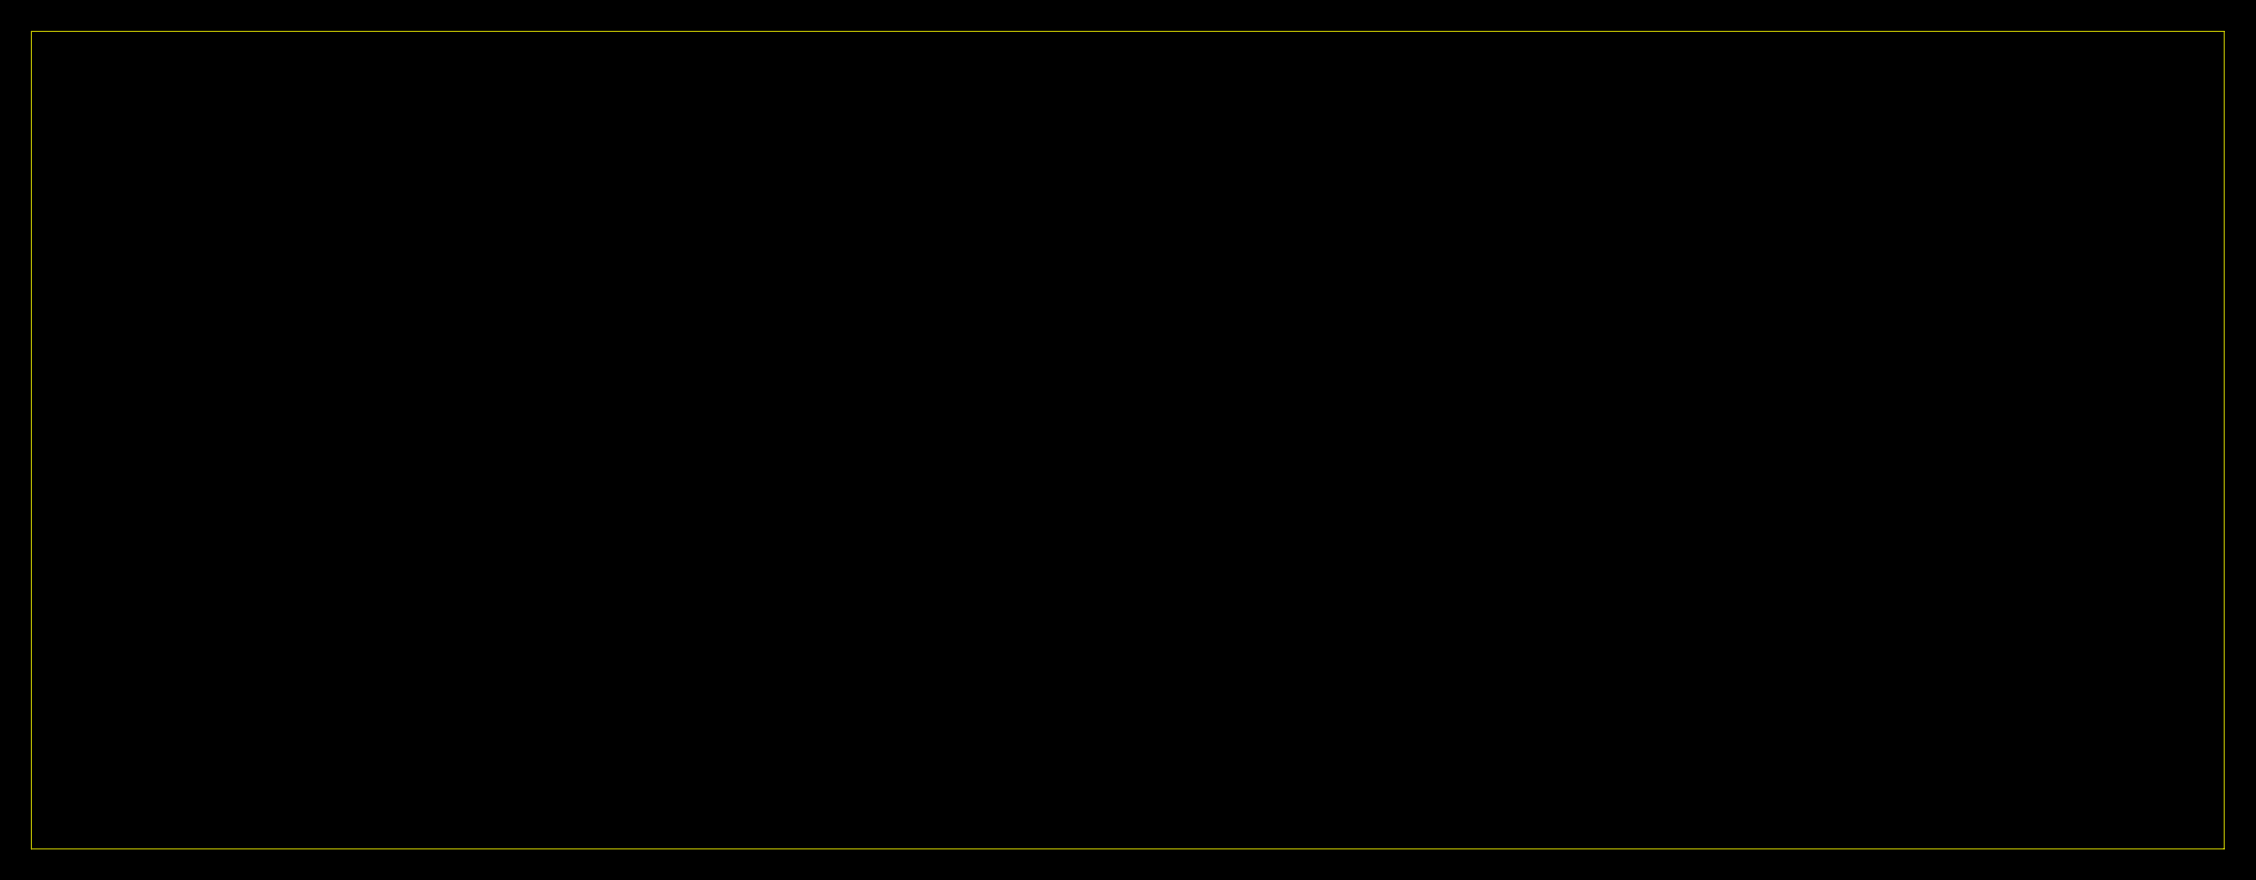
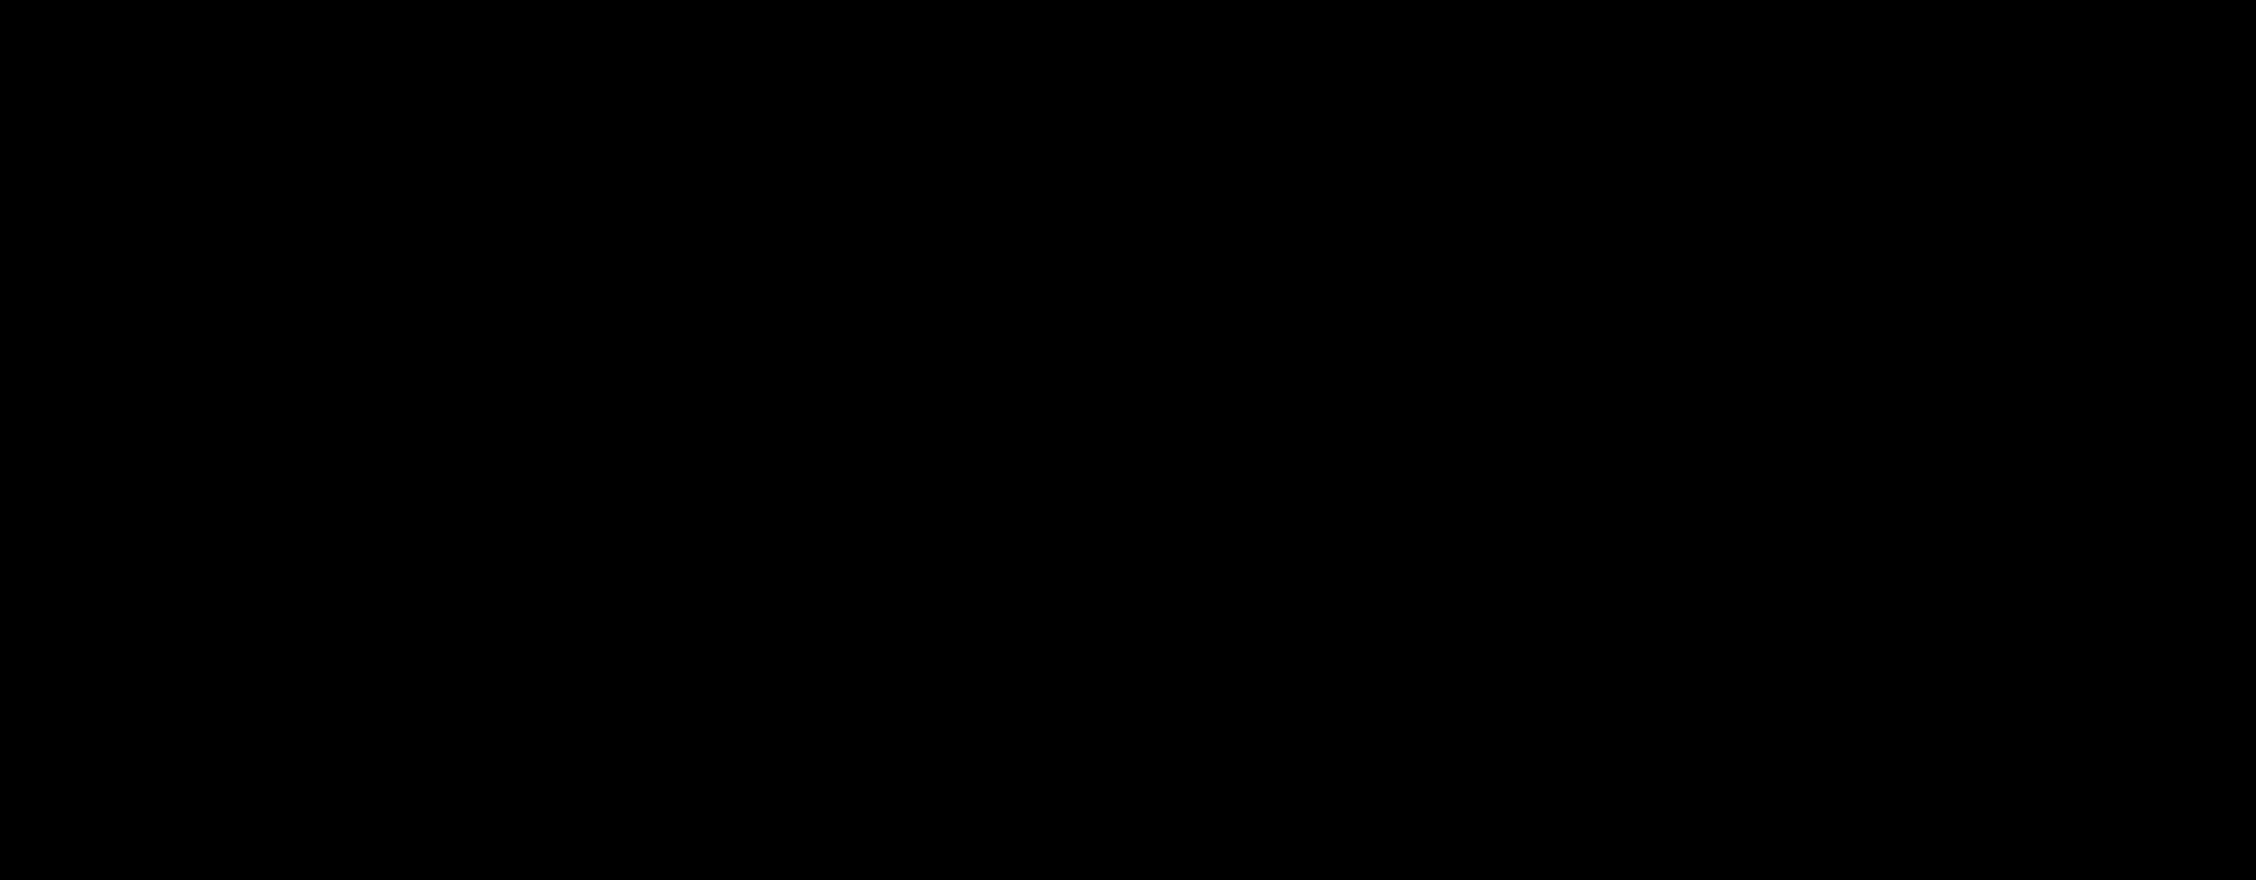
board edge: (2224, 31) (31, 31) (31, 848) (2224, 848) (2224, 31) -> none

